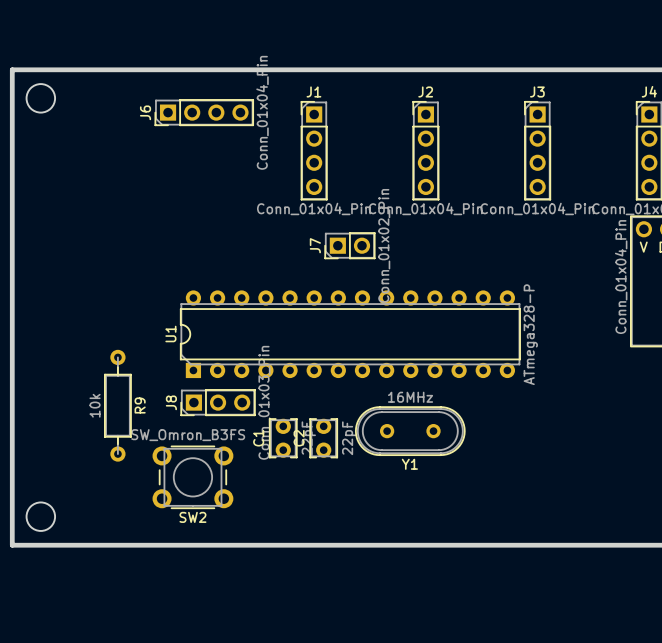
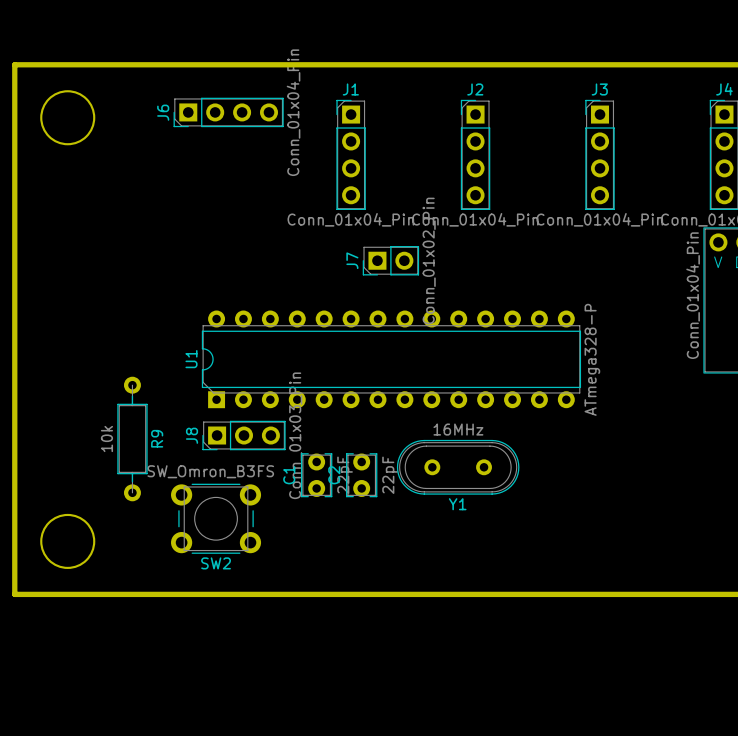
round board edge: [25, 83, 57, 114] -> none
round board edge: none -> [40, 90, 96, 146]
round board edge: none -> [40, 513, 96, 569]
round board edge: [25, 501, 57, 532] -> none

